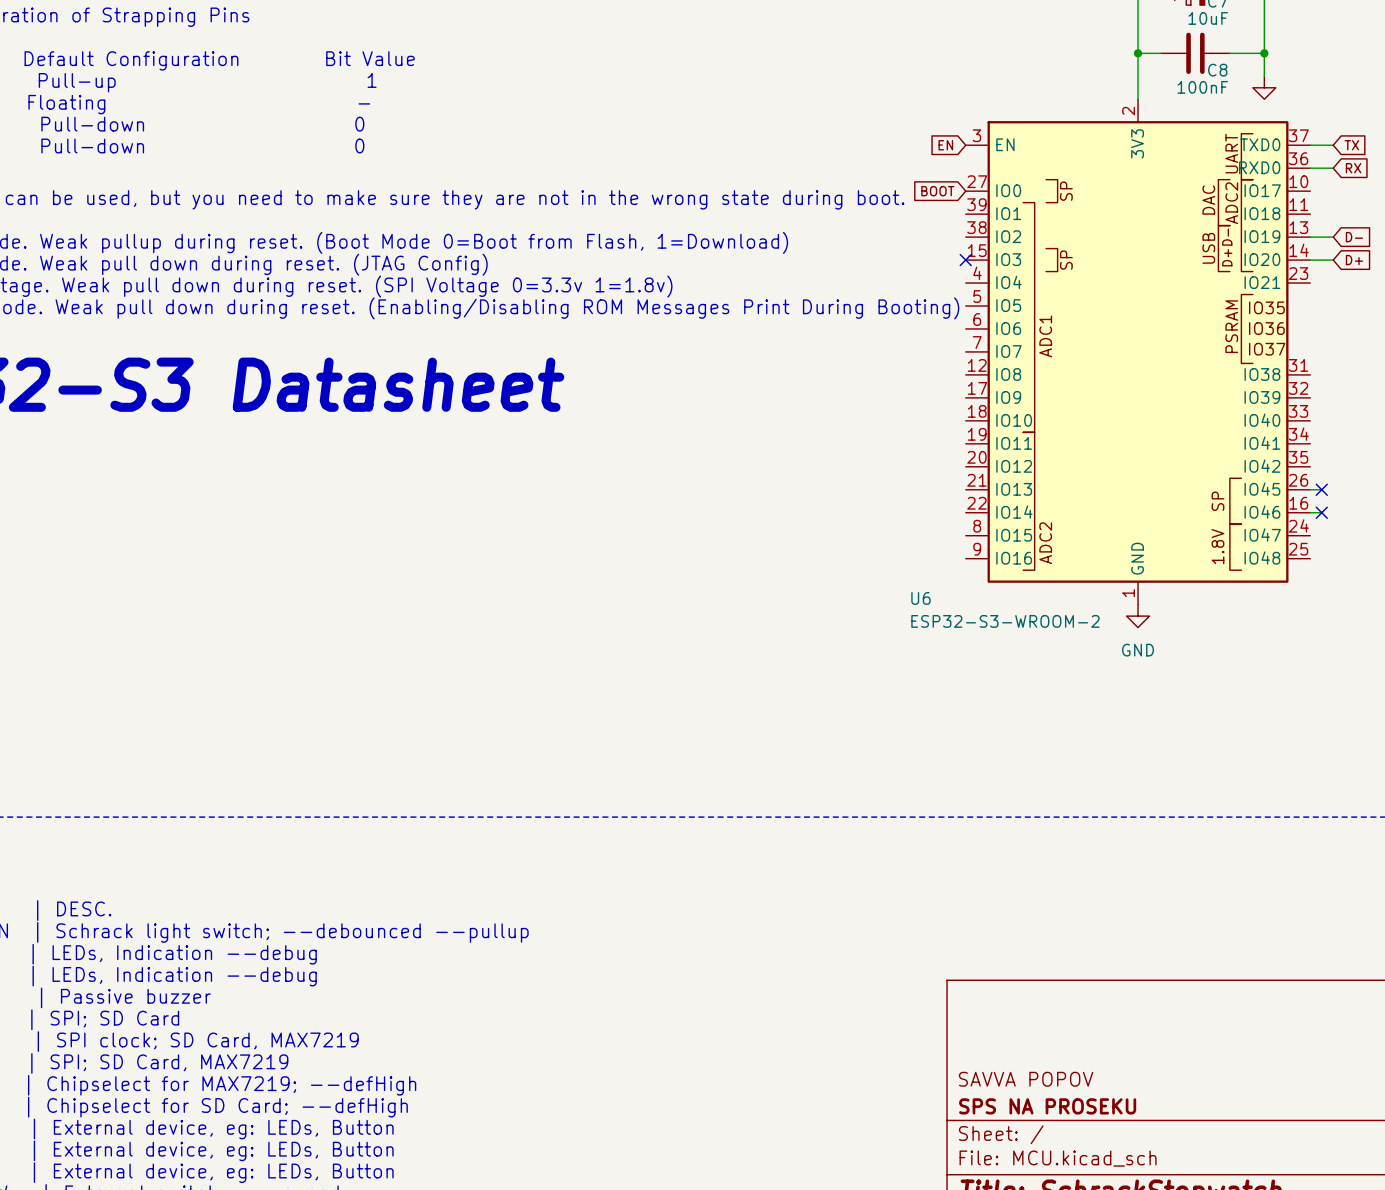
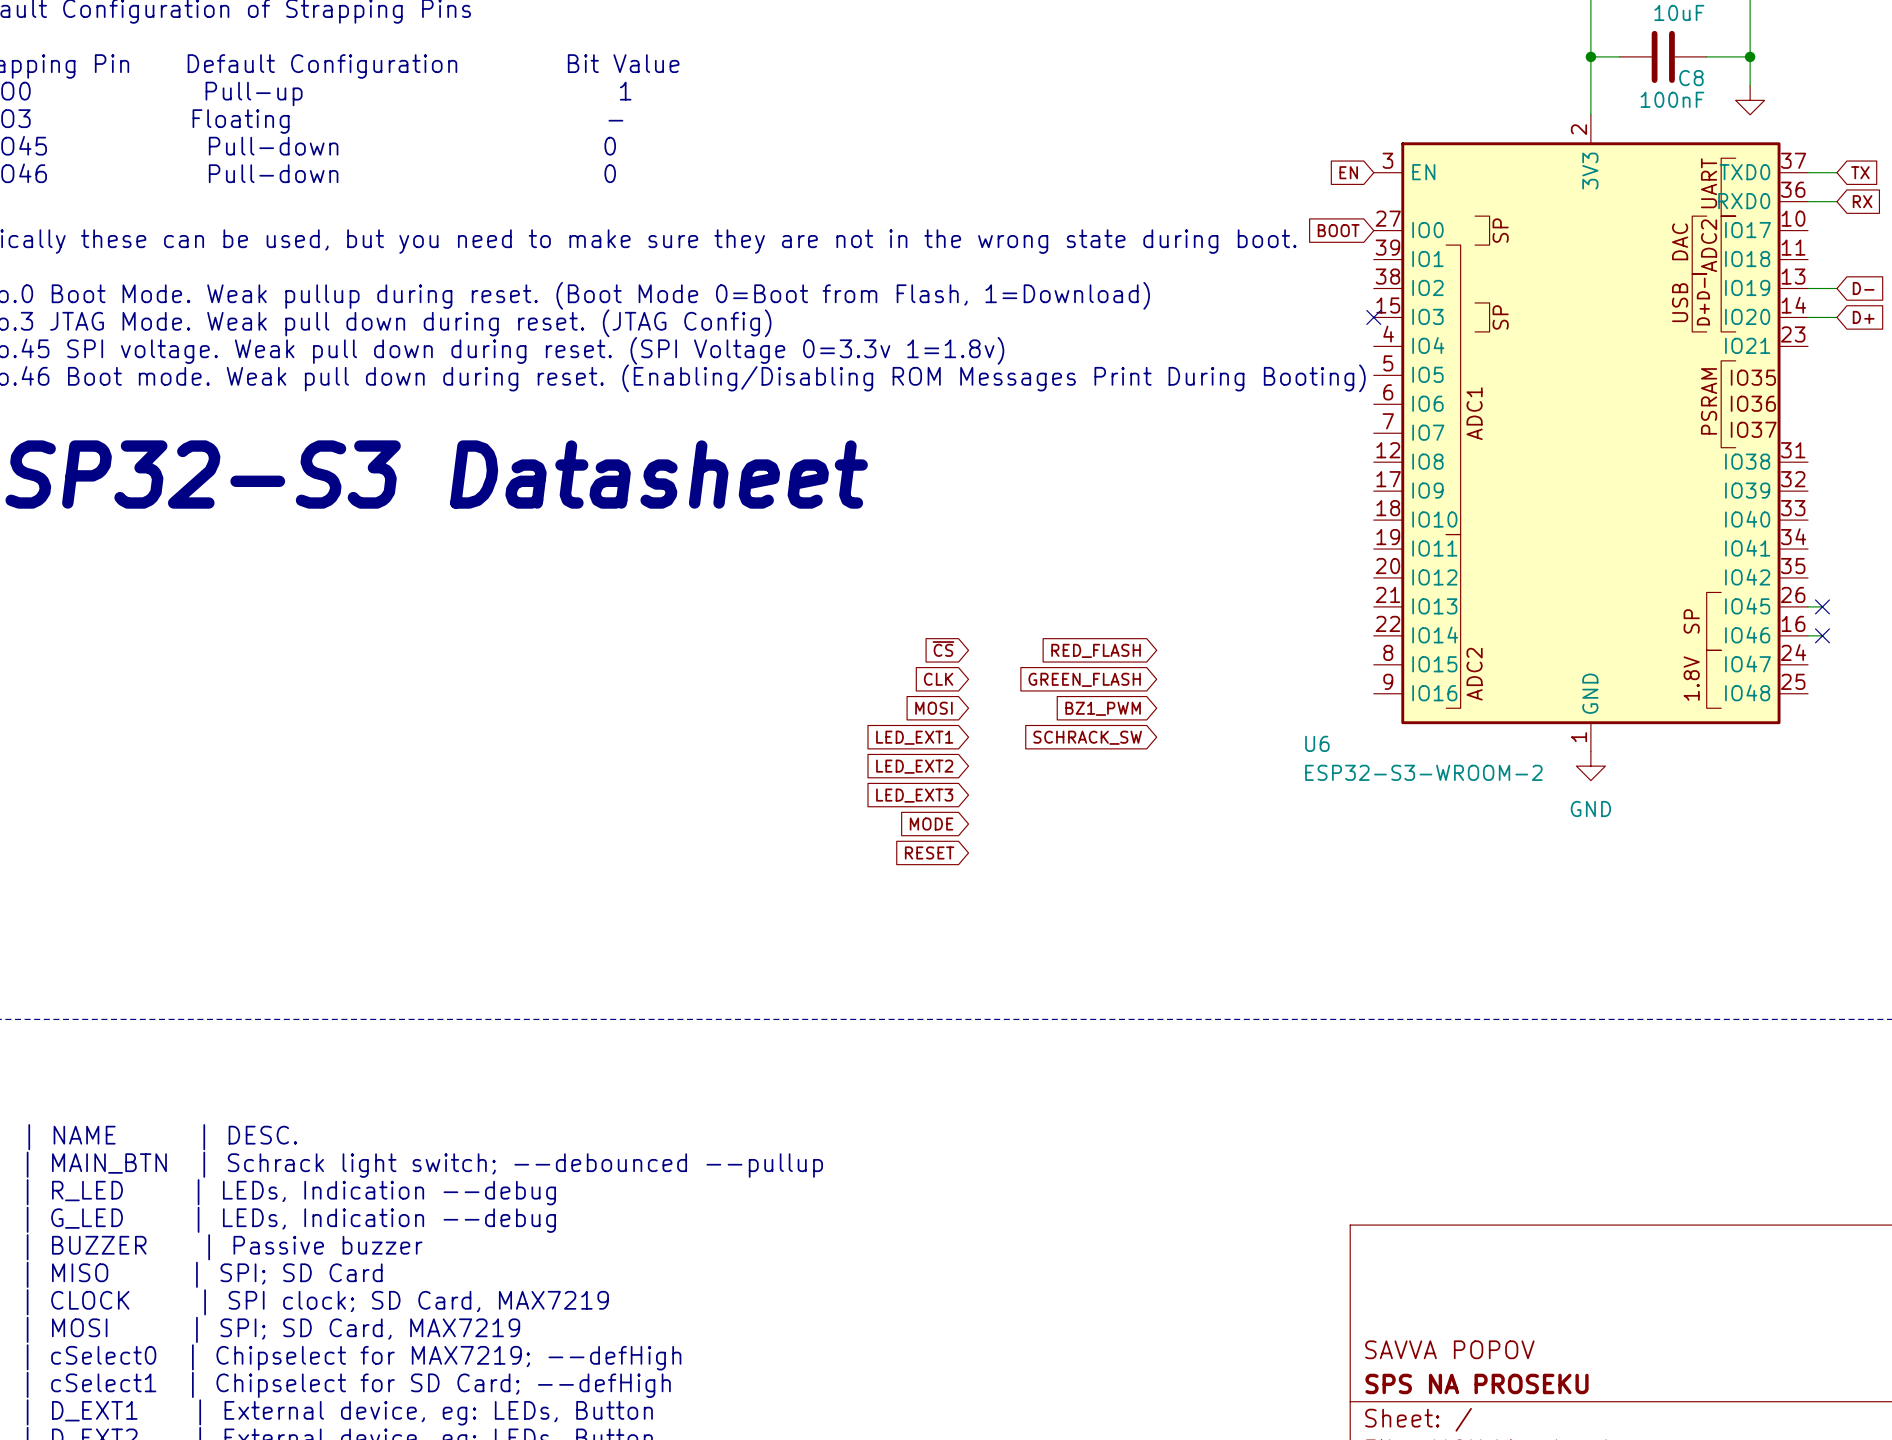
global label: none -> ~{CS} (943, 649)
global label: none -> RED_FLASH (1096, 650)
global label: none -> CLK (938, 679)
global label: none -> GREEN_FLASH (1084, 679)
global label: none -> MOSI (933, 708)
global label: none -> BZ1_PWM (1103, 708)
global label: none -> LED_EXT1 (914, 737)
global label: none -> SCHRACK_SW (1087, 737)
global label: none -> LED_EXT2 (914, 766)
global label: none -> LED_EXT3 (914, 795)
global label: none -> MODE (931, 824)
global label: none -> RESET (929, 852)

